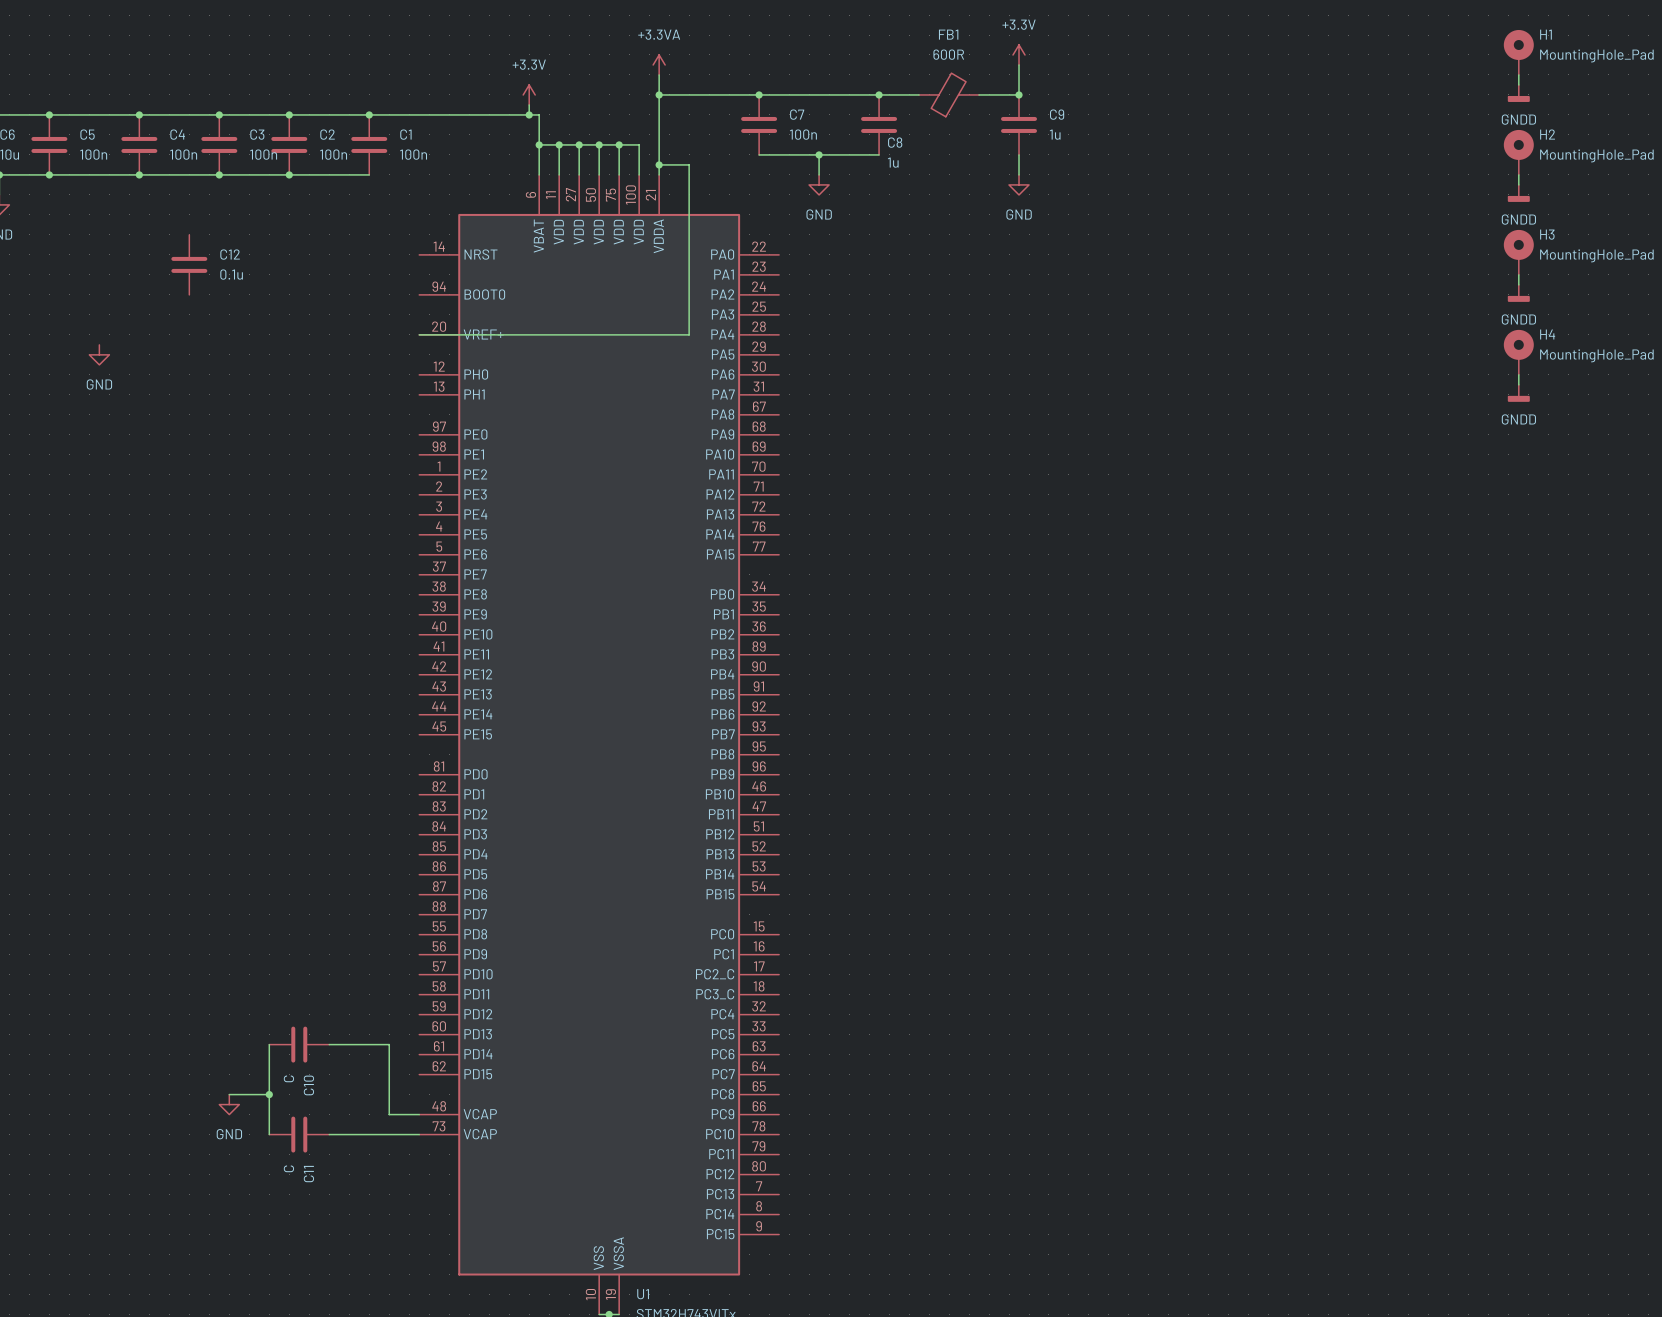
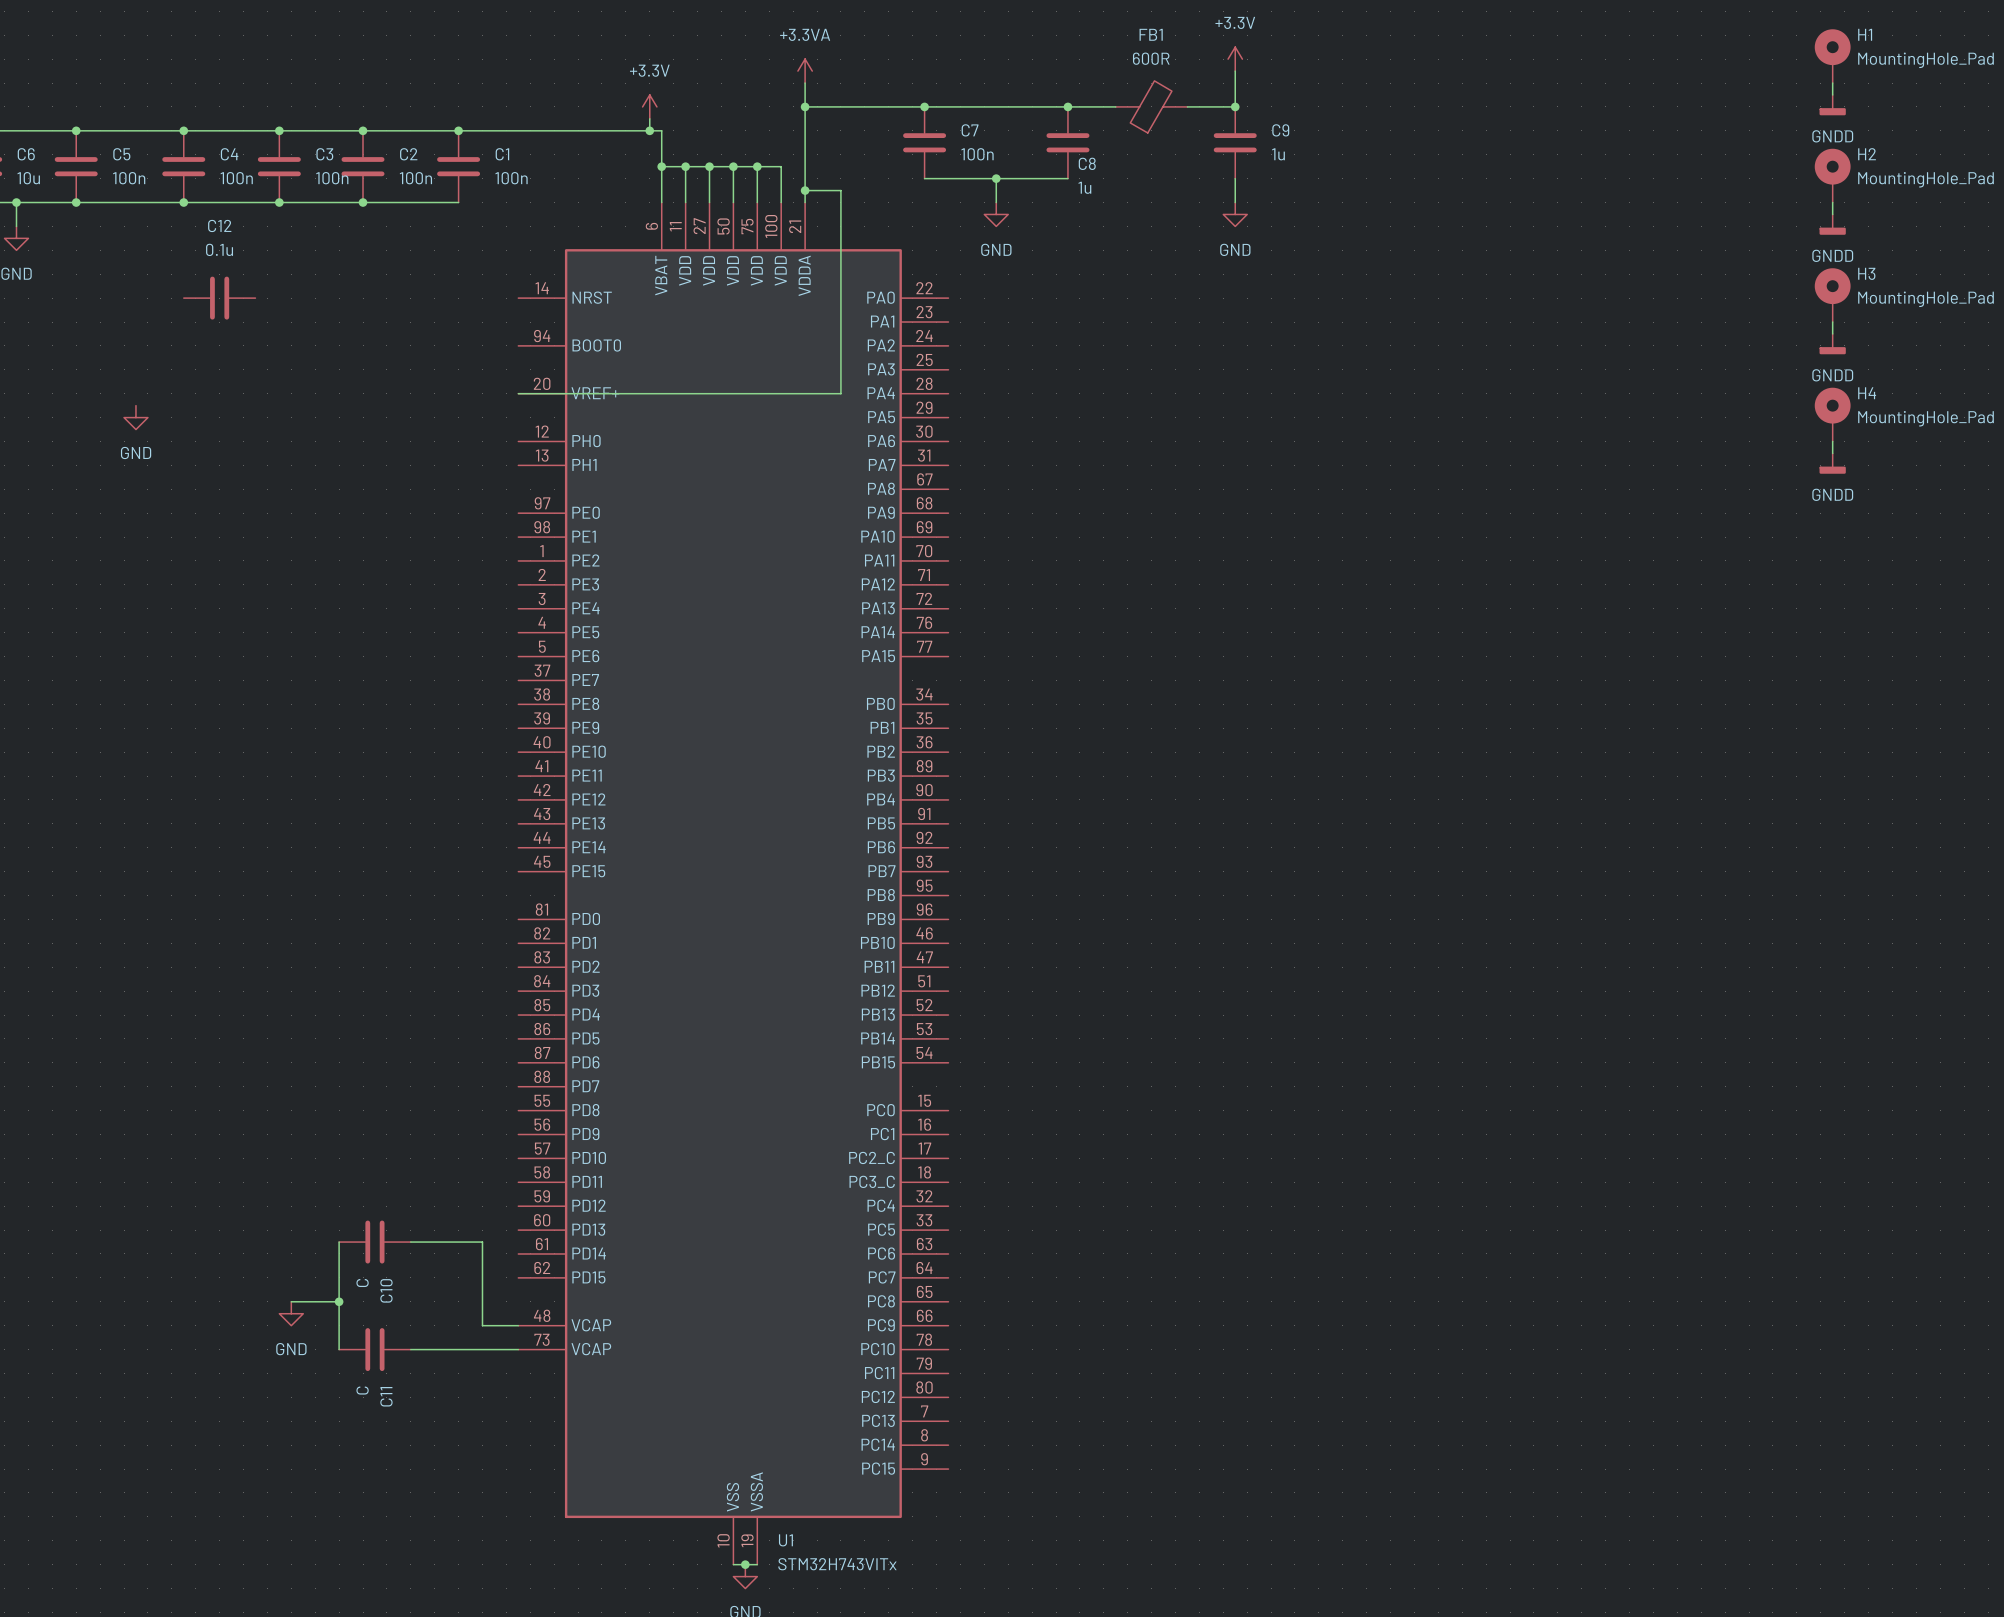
C12 name position: C12 (230, 254) -> C12 (219, 225)
C12 rotation: 0° (189, 264) -> 90° clockwise (219, 298)
C12 value position: 0.1u (231, 274) -> 0.1u (219, 249)

